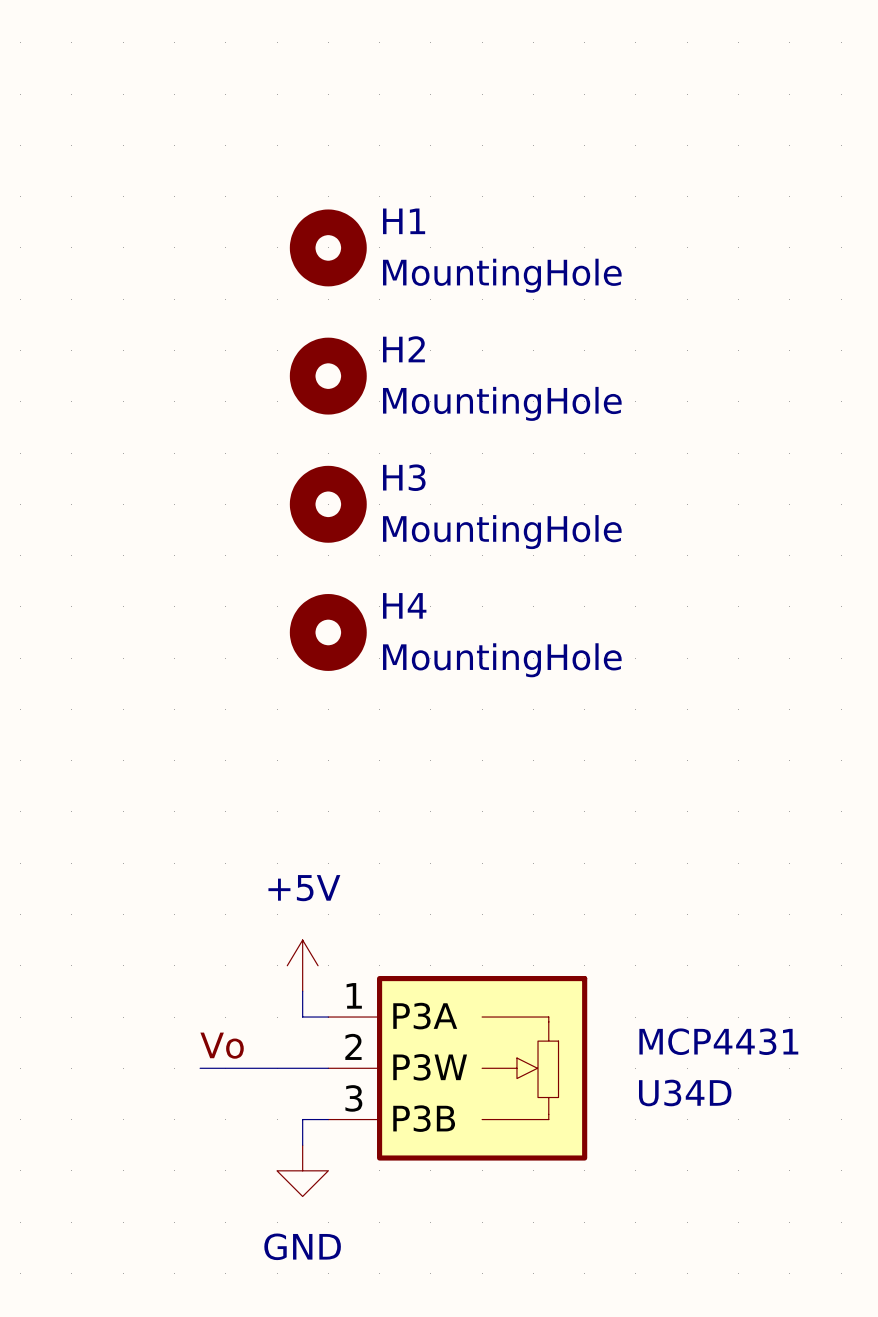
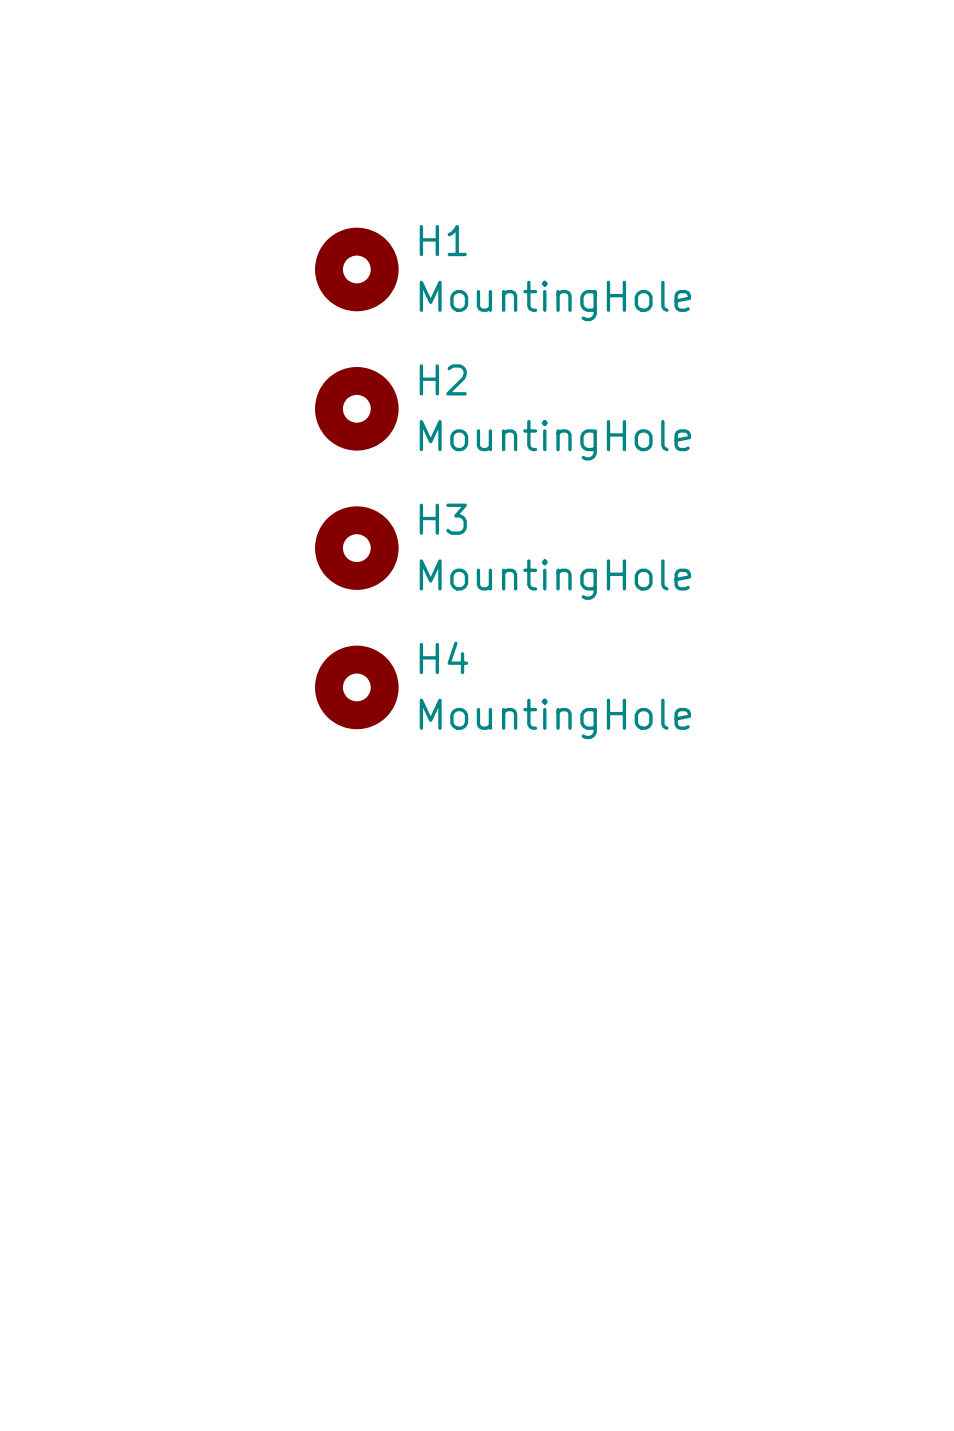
power symbol: +5V (302, 965) -> none
wire: (302, 991) (302, 1017) (328, 1017) -> none
label: Vo (222, 1045) -> none
wire: (200, 1068) (328, 1068) -> none
U34D: MCP4431 (457, 1068) -> none
wire: (328, 1119) (302, 1119) (302, 1145) -> none
power symbol: GND (302, 1170) -> none

